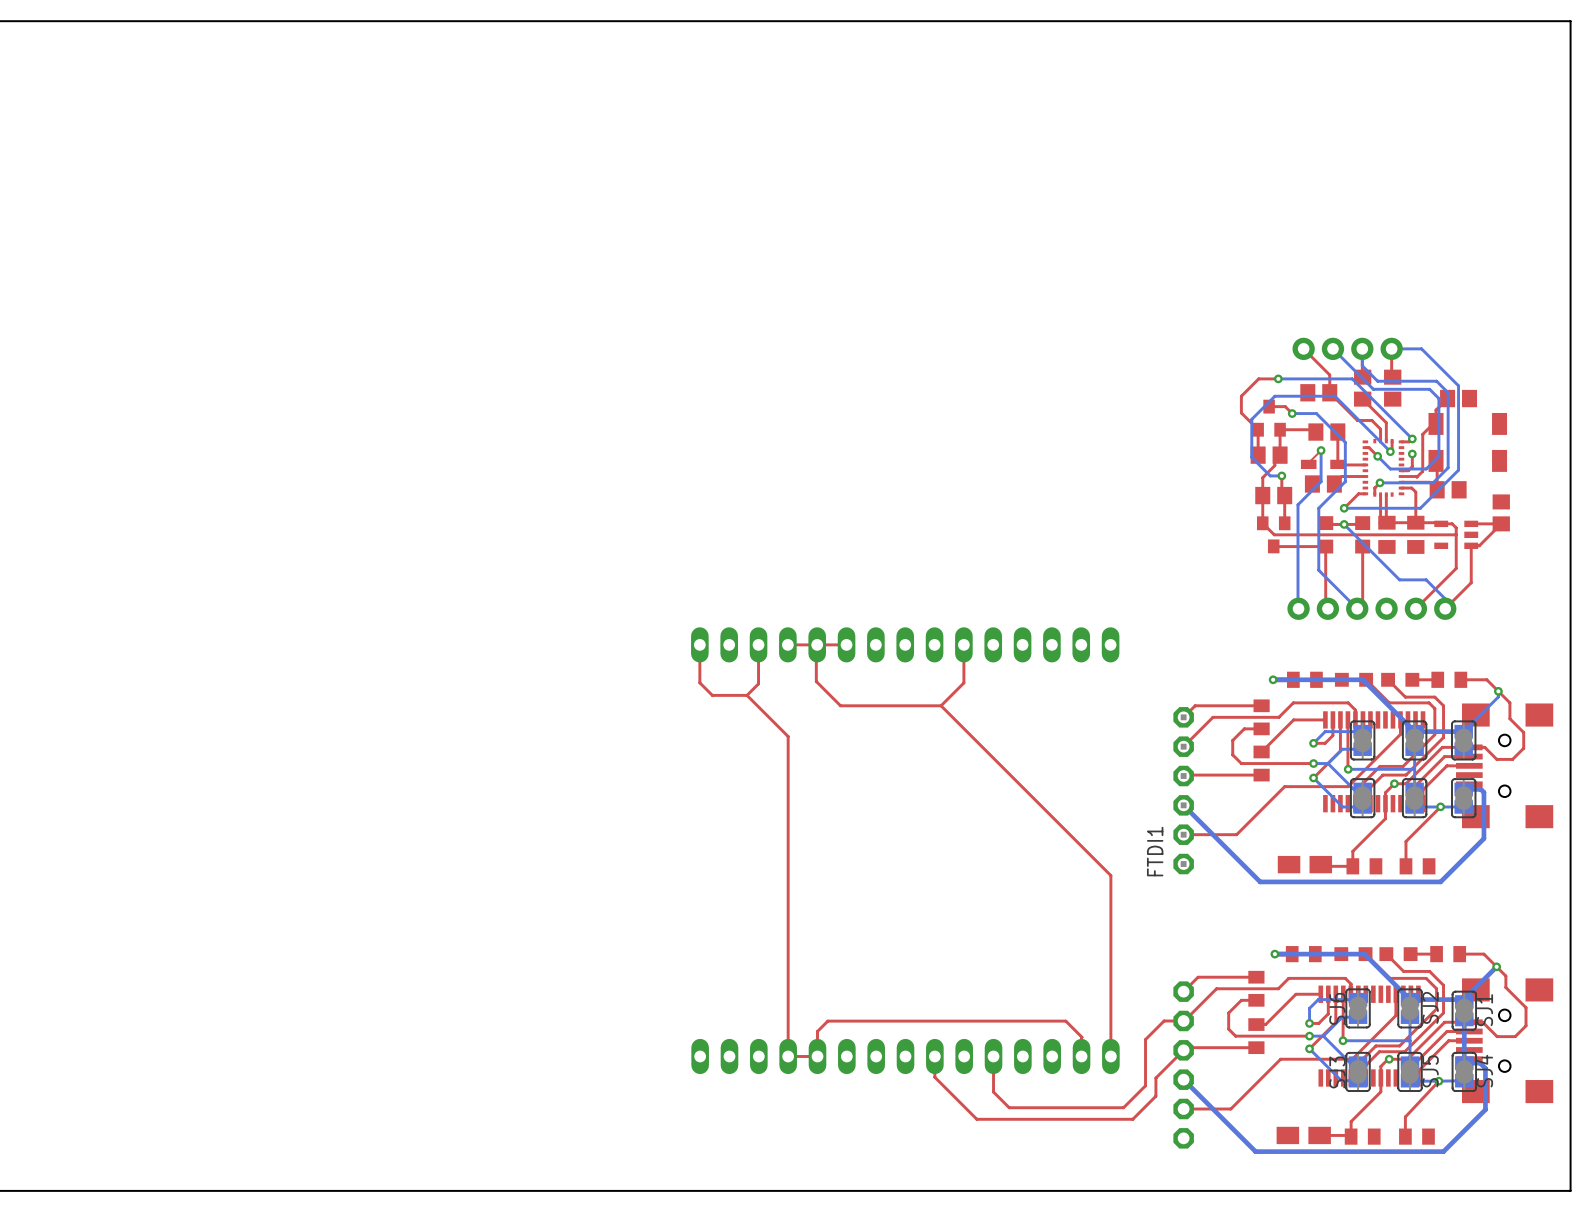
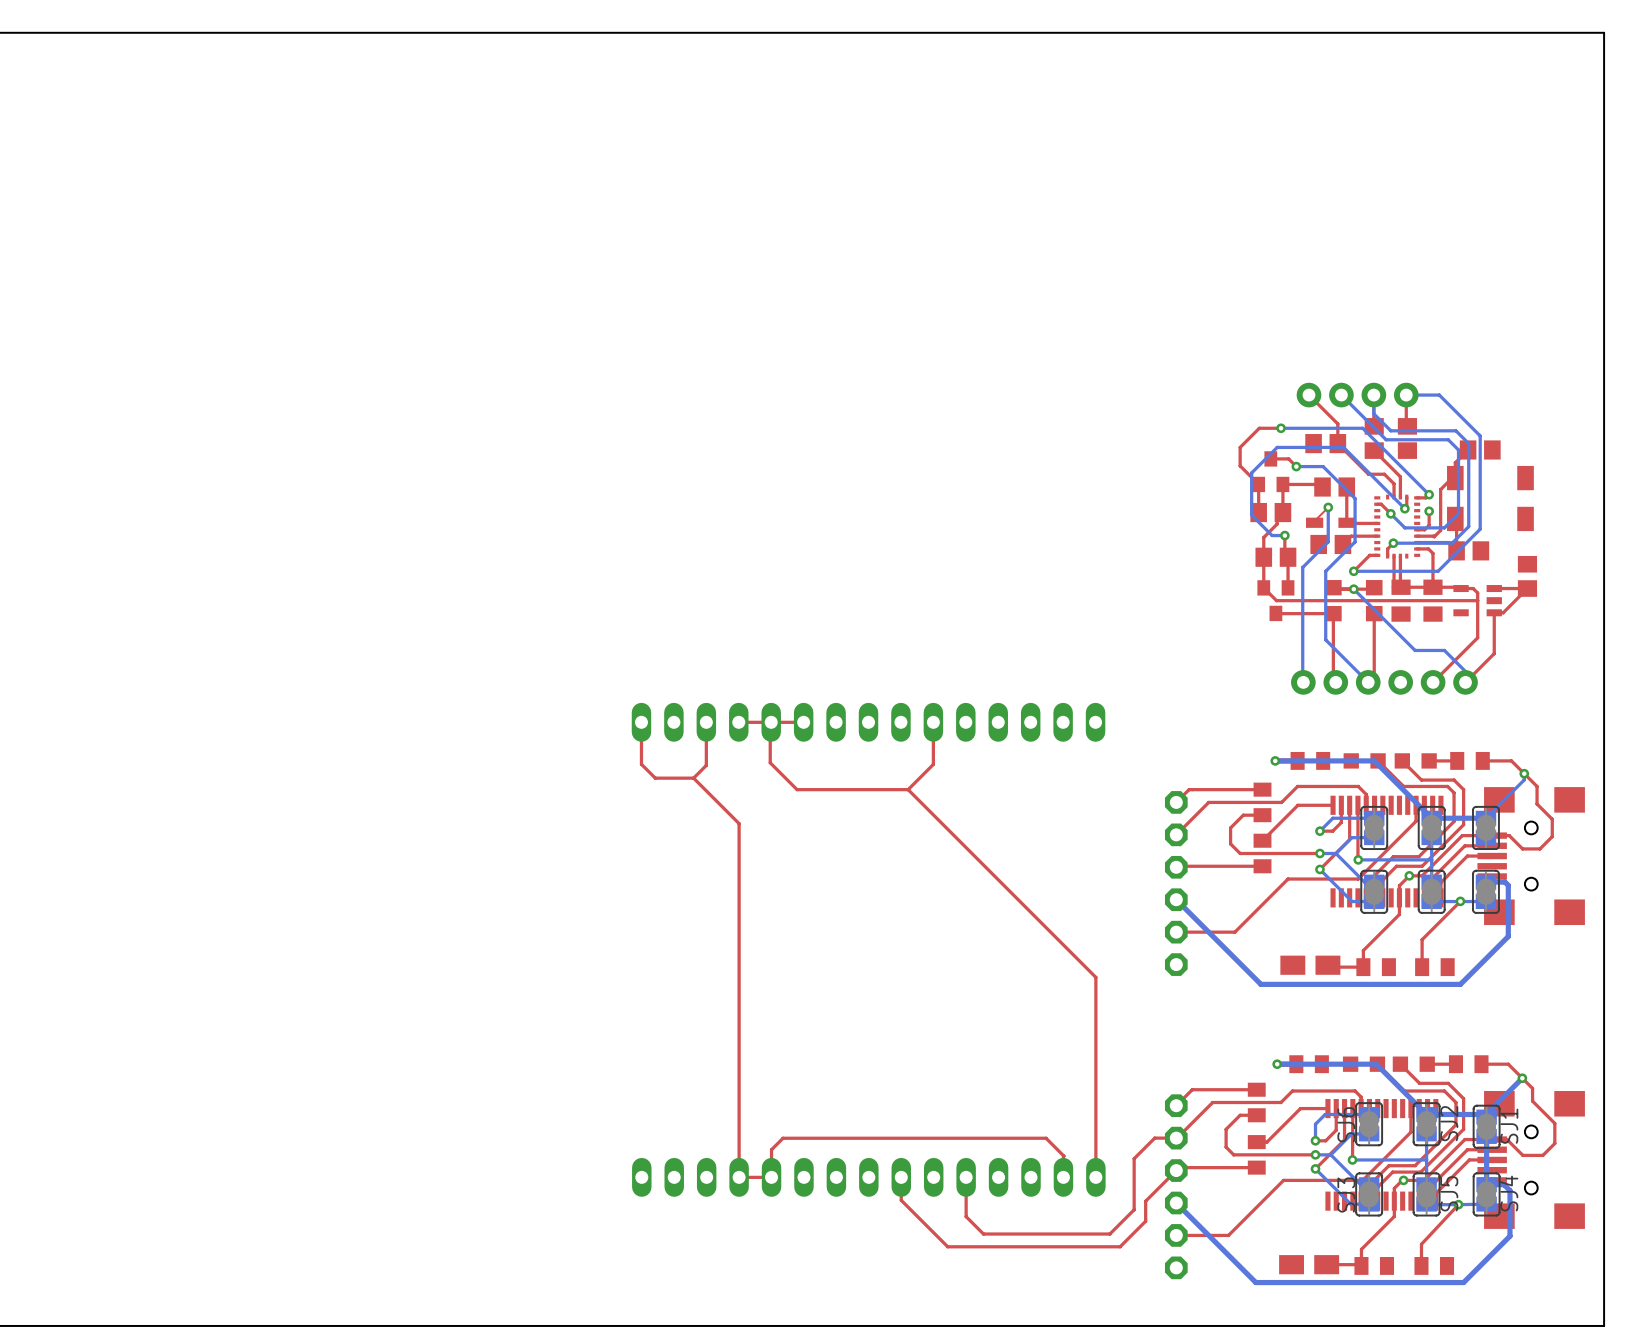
FTDI1 side: bottom (1183, 790) -> top (1176, 883)

